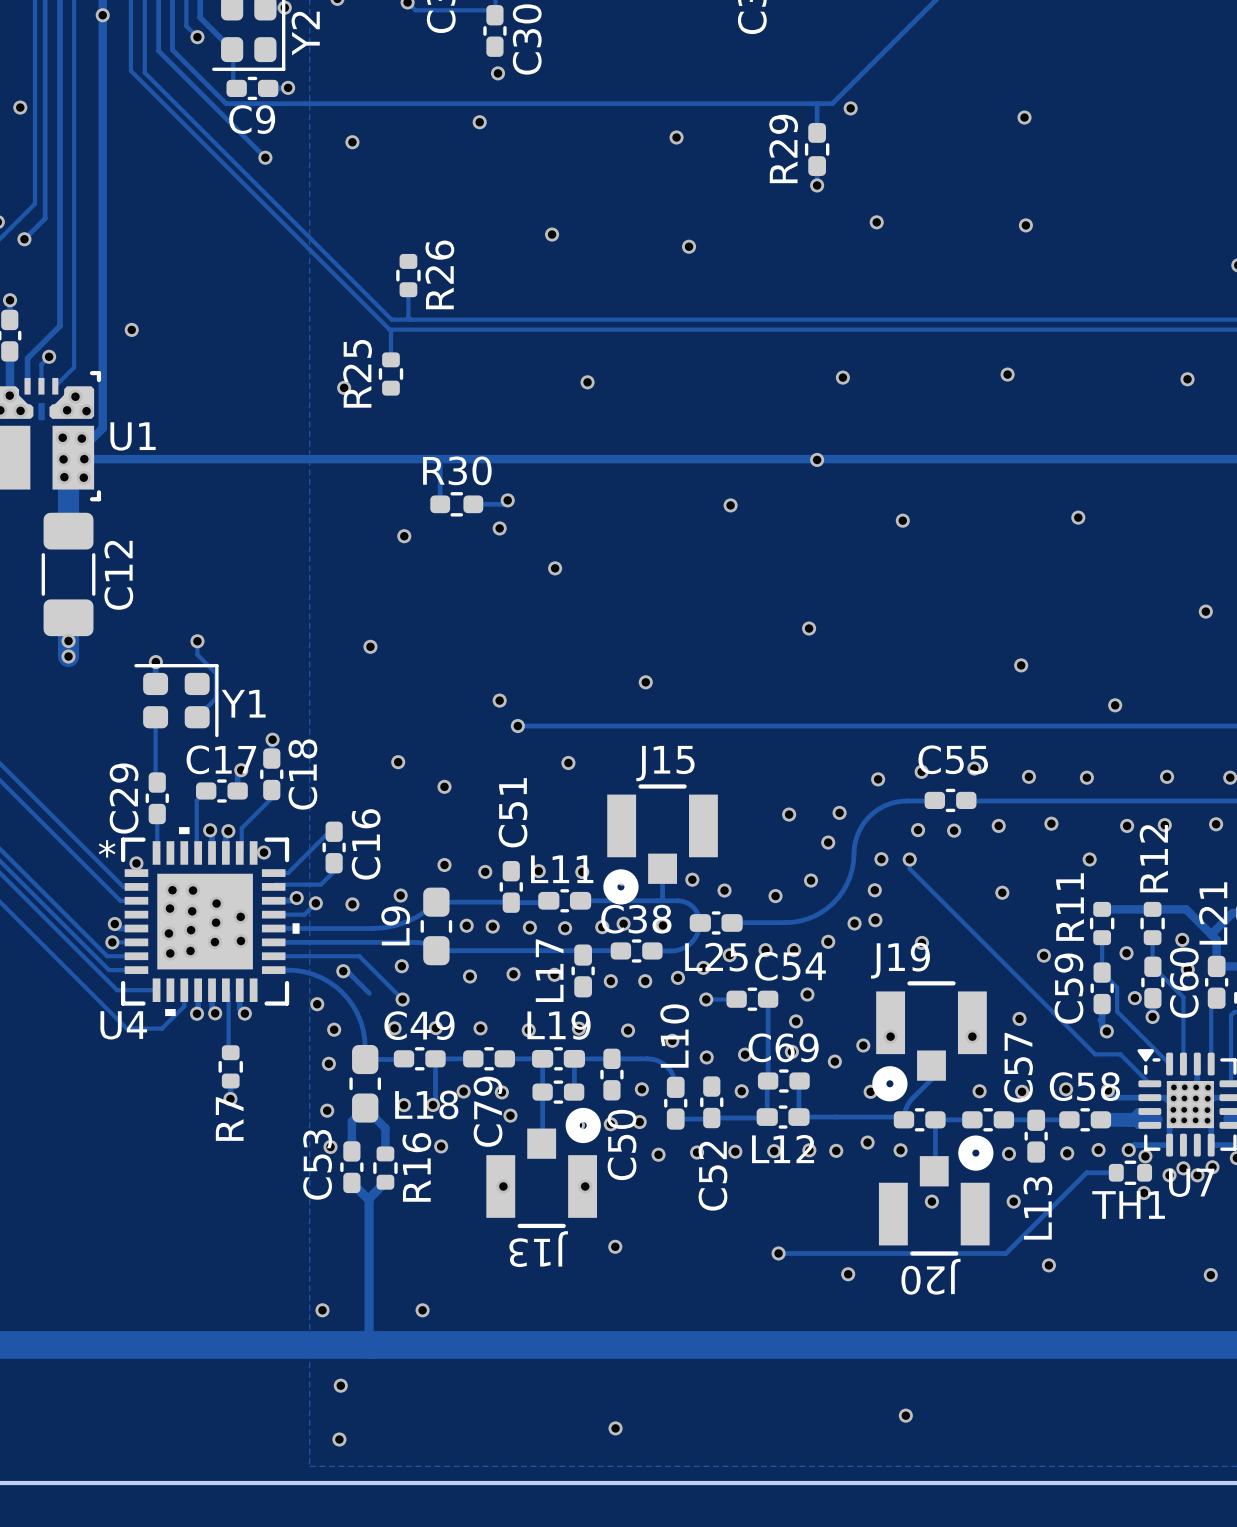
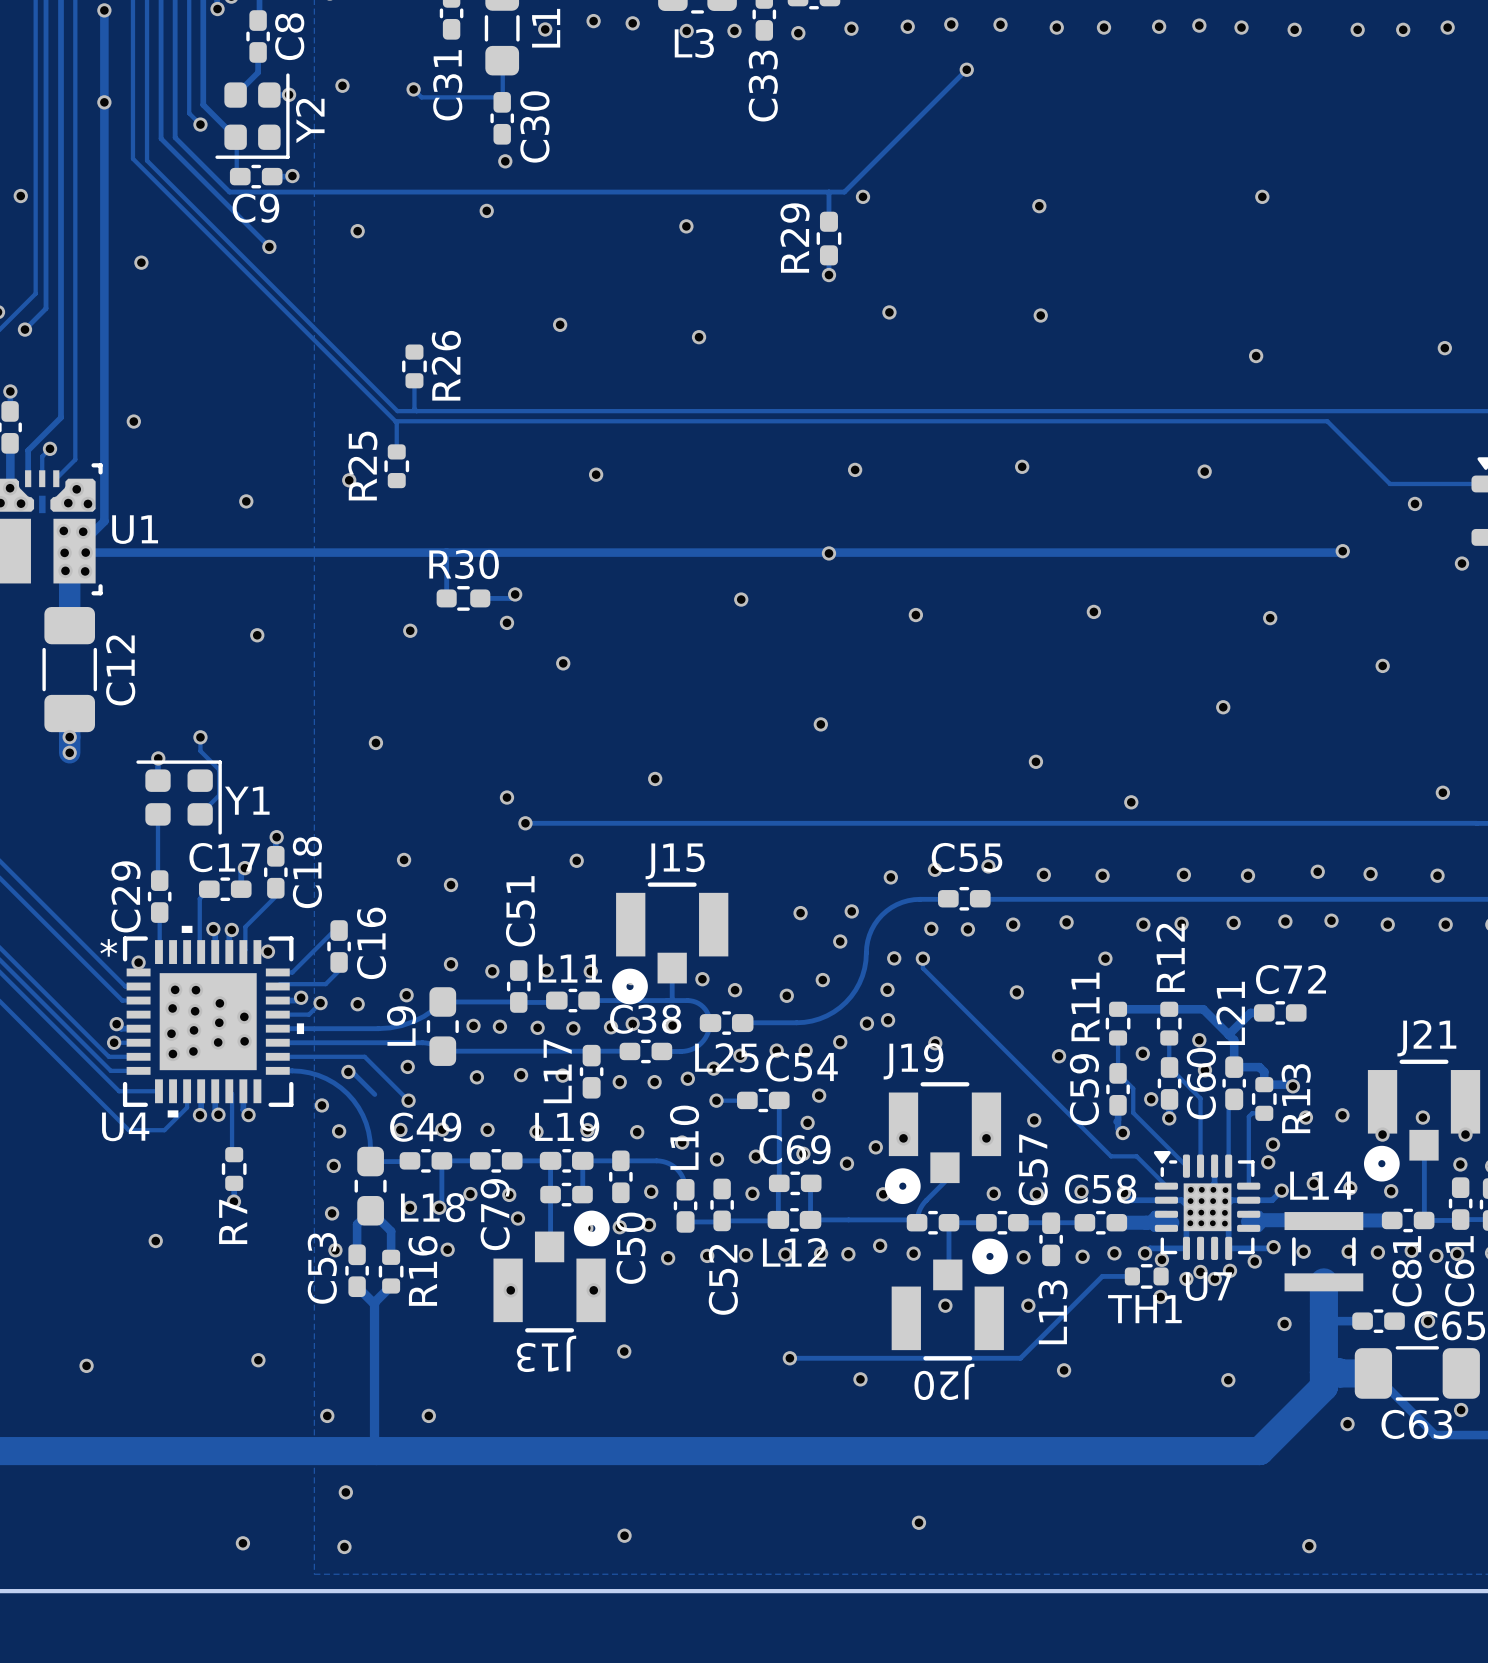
via: none -> (141, 262)
via: none -> (246, 501)
via: none -> (257, 635)
via: none -> (155, 1241)
via: none -> (258, 1360)
via: none -> (86, 1365)
via: none -> (242, 1543)

